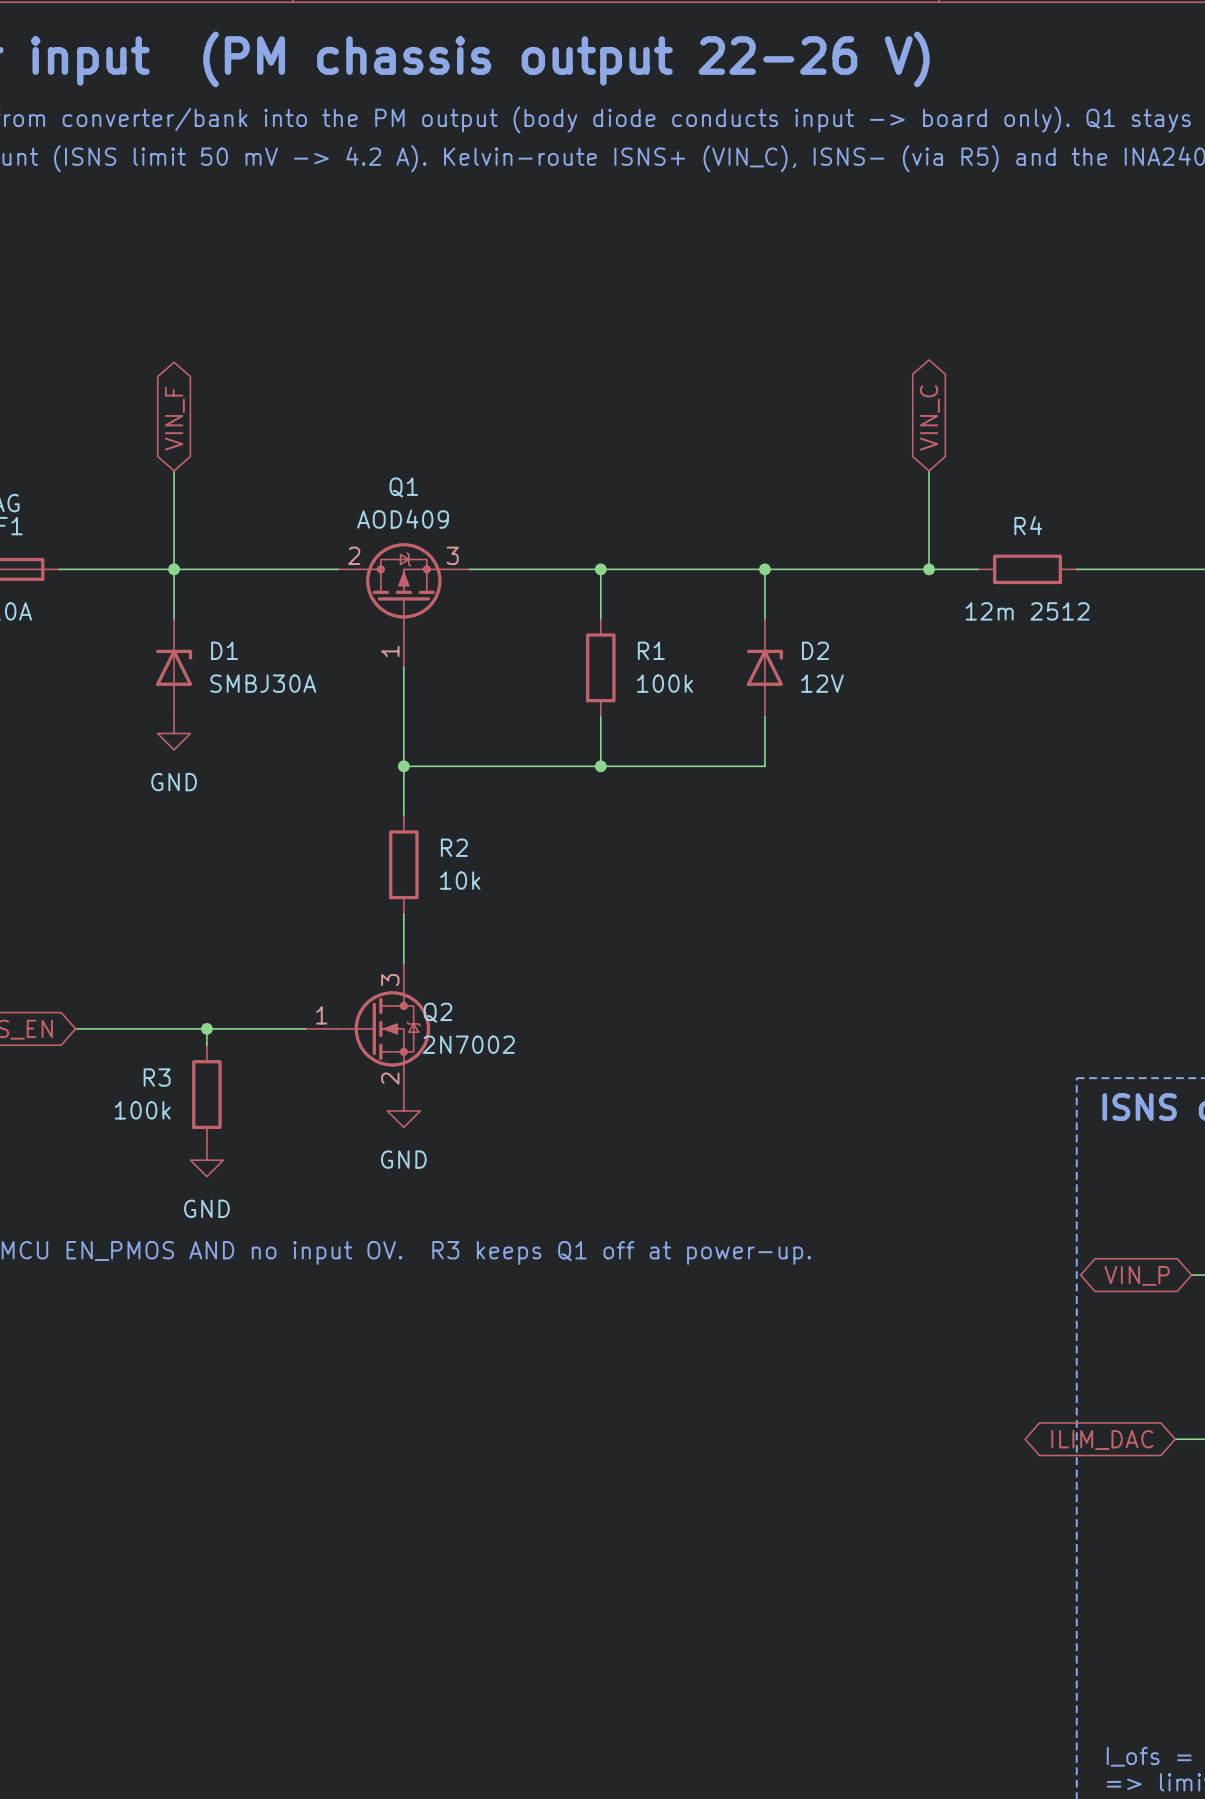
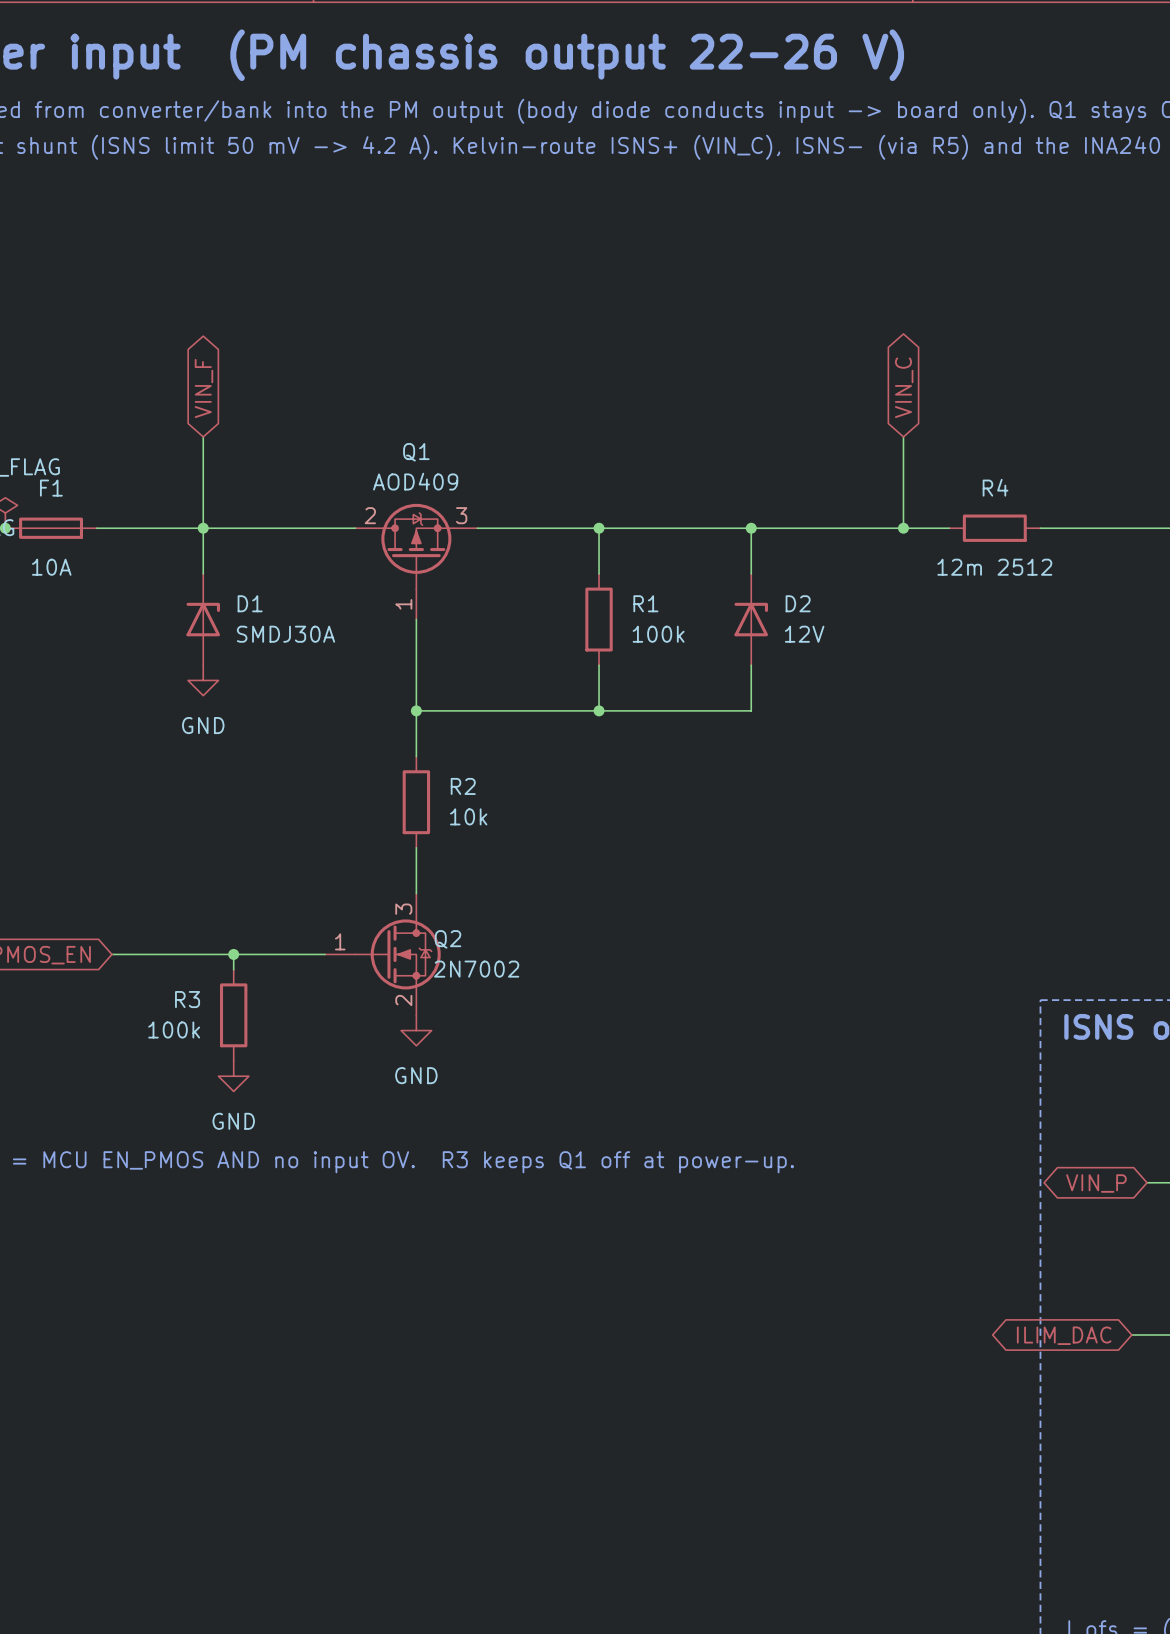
D1 value: SMBJ30A (263, 683) -> SMDJ30A (286, 634)

